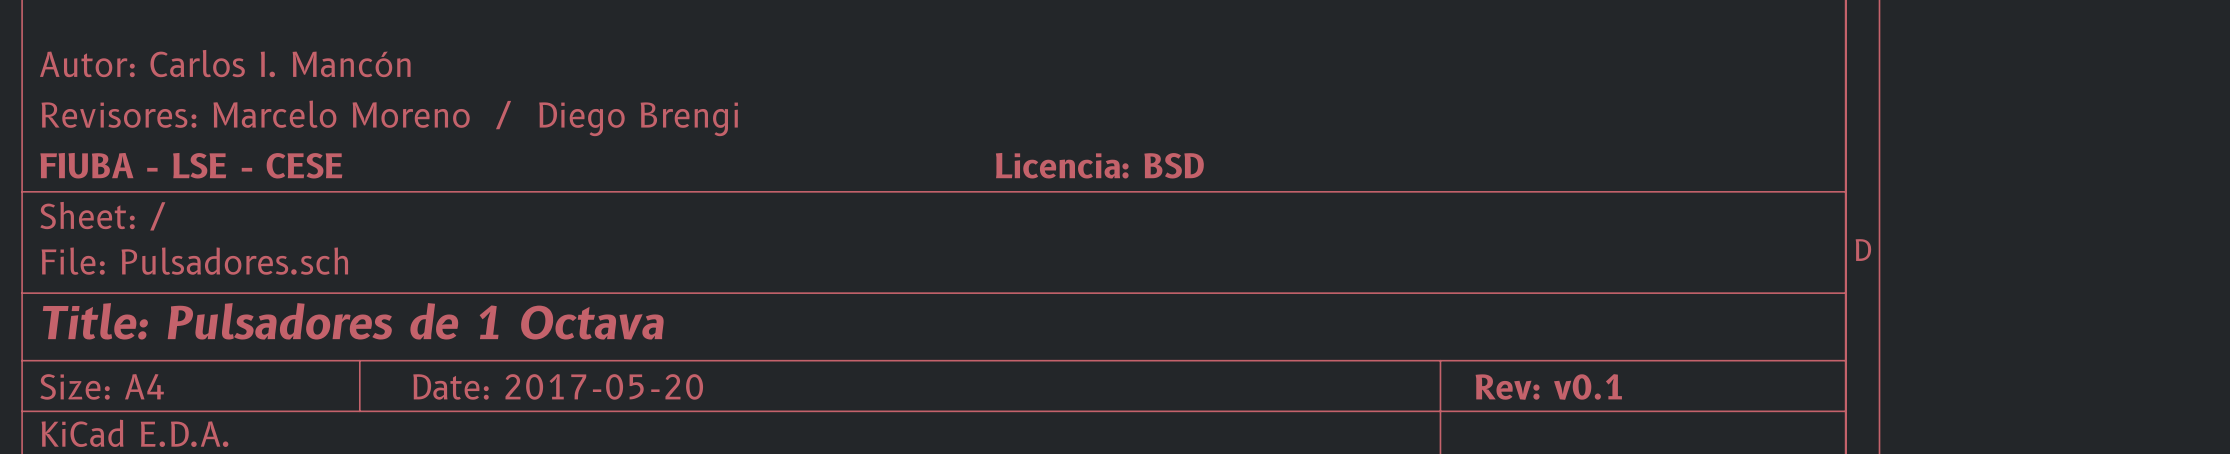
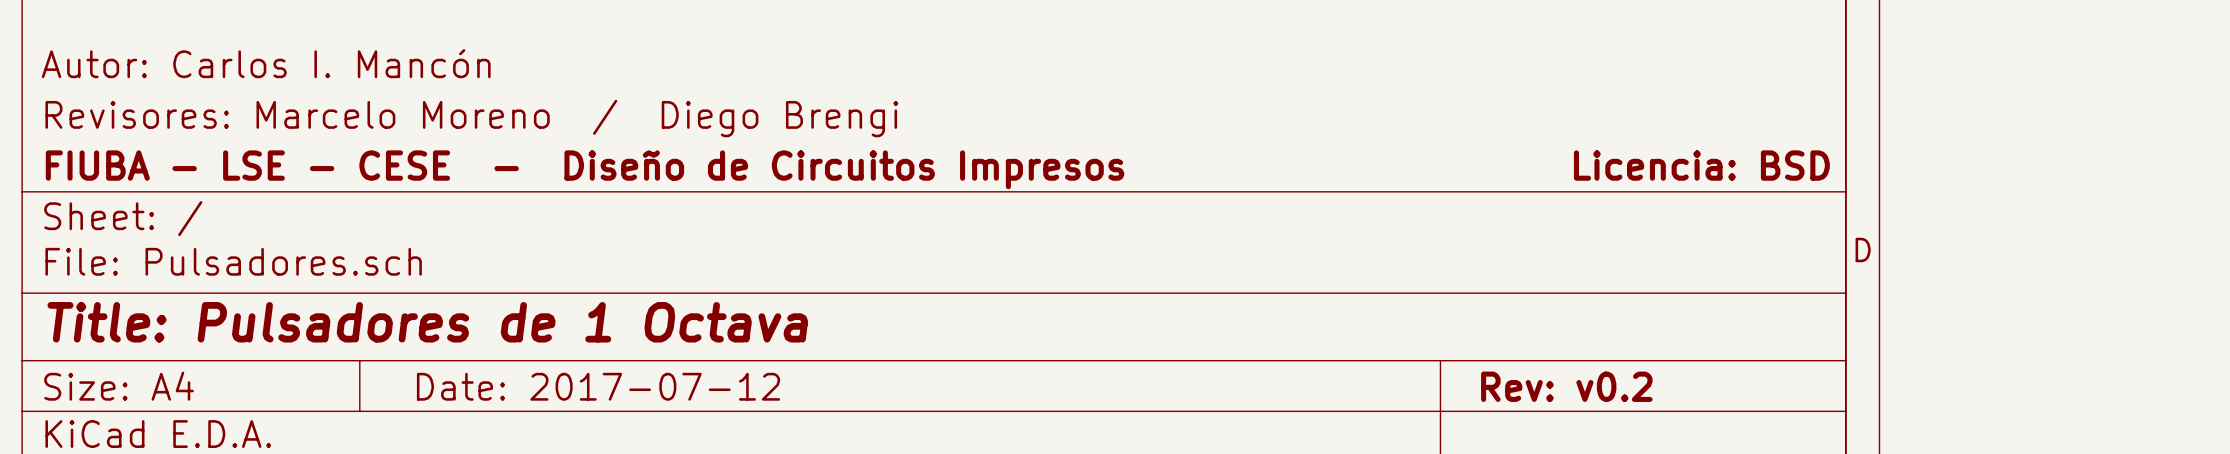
title block: FIUBA - LSE - CESE Licencia: BSD (622, 165) -> FIUBA - LSE - CESE - Diseño de Circuitos Impresos Licencia: BSD (937, 169)
title block: Date: 2017-05-20 (558, 386) -> Date: 2017-07-12 (598, 386)
title block: Rev: v0.1 (1548, 386) -> Rev: v0.2 (1566, 386)

